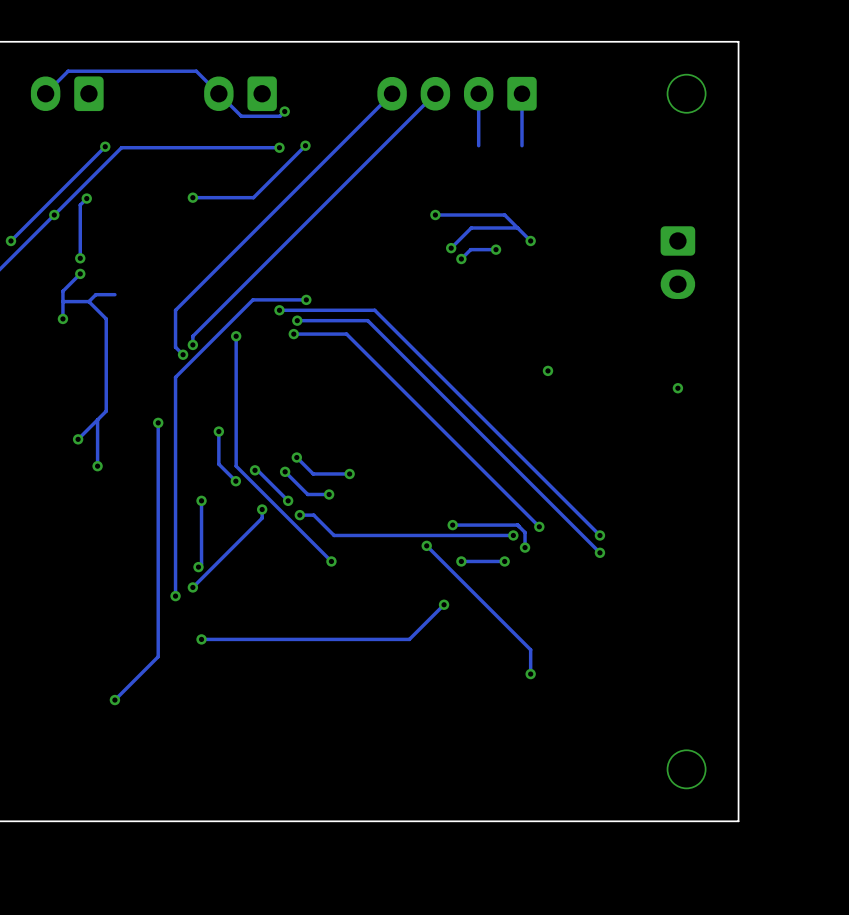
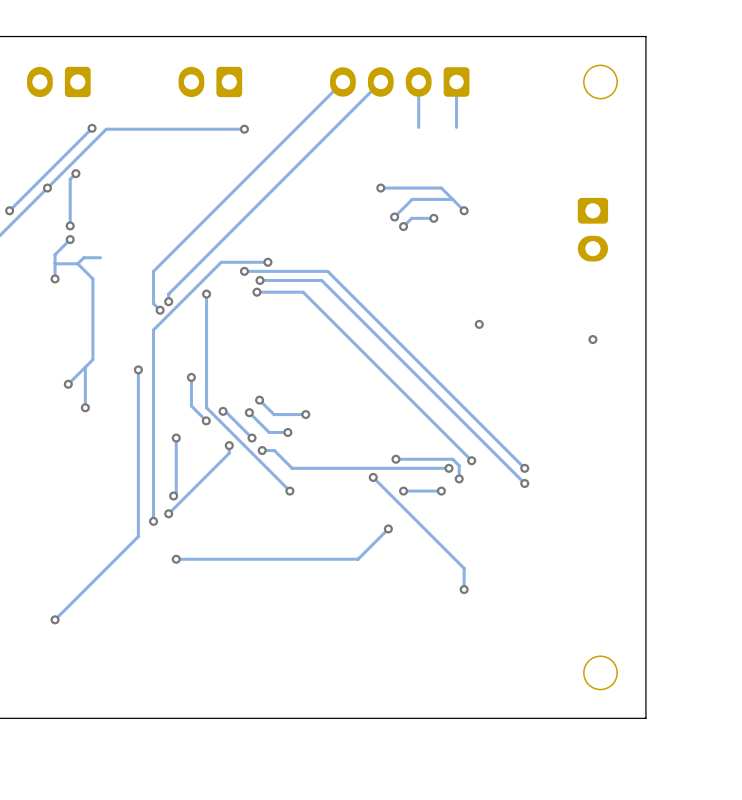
track: (45, 93) (68, 71) (196, 71) (241, 116) (279, 116) (284, 111) -> none
via: (284, 111) -> none
track: (305, 145) (253, 197) (192, 197) -> none
via: (305, 145) -> none
via: (192, 197) -> none
track: (158, 613) (158, 656) (114, 700) -> (138, 536) (55, 619)
via position: (114, 700) -> (55, 619)

